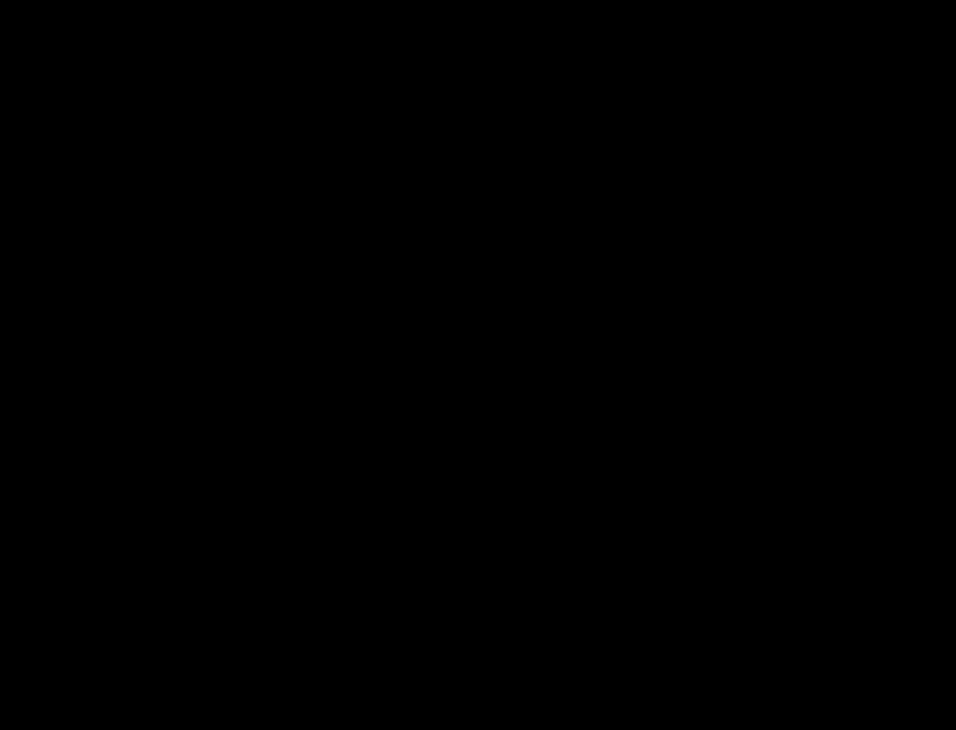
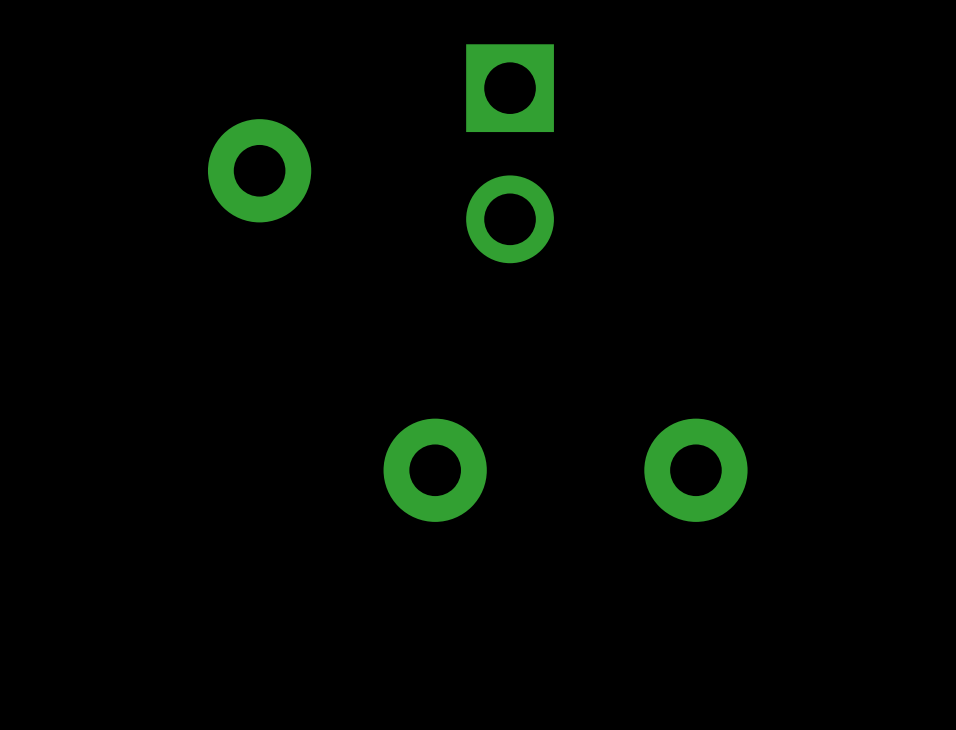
part: none -> (510, 153)
part: none -> (259, 170)
part: none -> (435, 470)
part: none -> (695, 470)

